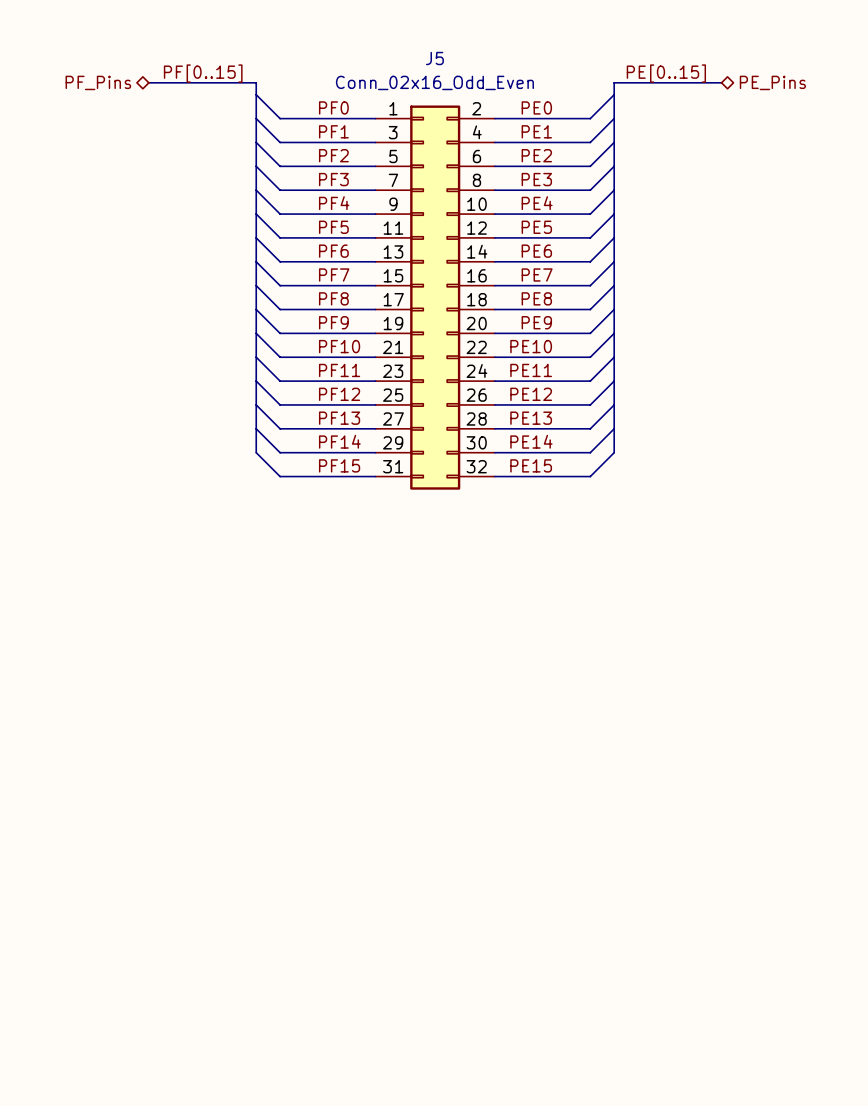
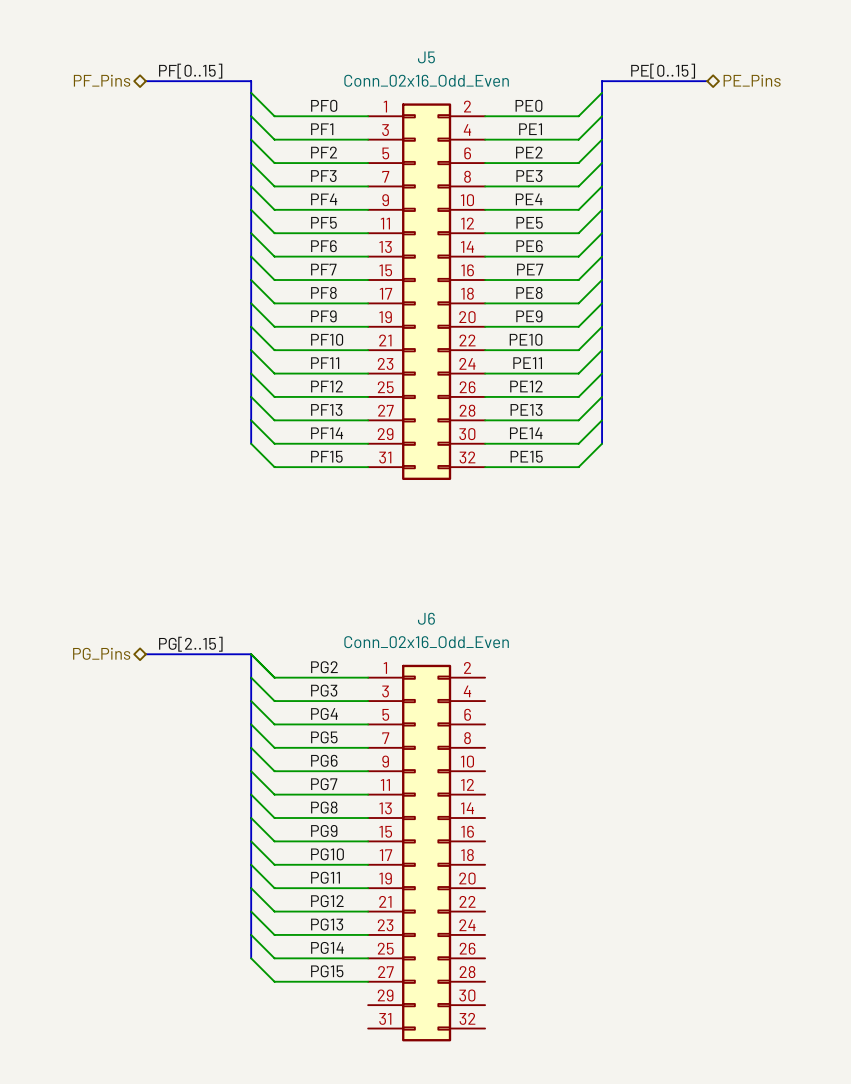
label: none -> PG[2..15] (190, 644)
hierarchical label: none -> PG_Pins (101, 653)
bus: none -> (145, 654) (251, 654) (251, 958)
wire: none -> (251, 654) (274, 677) (368, 677)
label: none -> PG2 (324, 667)
wire: none -> (251, 677) (274, 701) (368, 701)
label: none -> PG3 (324, 690)
wire: none -> (251, 701) (274, 724) (368, 724)
label: none -> PG4 (324, 714)
wire: none -> (251, 724) (274, 747) (368, 747)
label: none -> PG5 (324, 737)
wire: none -> (251, 747) (274, 771) (368, 771)
label: none -> PG6 (324, 760)
wire: none -> (251, 771) (274, 794) (368, 794)
label: none -> PG7 (324, 784)
wire: none -> (251, 794) (274, 818) (368, 818)
label: none -> PG8 (324, 807)
wire: none -> (251, 818) (274, 841) (368, 841)
label: none -> PG9 (324, 830)
wire: none -> (251, 841) (274, 864) (368, 864)
J6: none -> Conn_02x16_Odd_Even (426, 853)
label: none -> PG10 (327, 854)
wire: none -> (251, 864) (274, 888) (368, 888)
label: none -> PG11 (325, 877)
wire: none -> (251, 888) (274, 911) (368, 911)
label: none -> PG12 (327, 901)
wire: none -> (251, 911) (274, 934) (368, 934)
label: none -> PG13 (327, 924)
wire: none -> (251, 934) (274, 958) (368, 958)
label: none -> PG14 (327, 947)
wire: none -> (251, 958) (274, 981) (368, 981)
label: none -> PG15 (327, 971)

